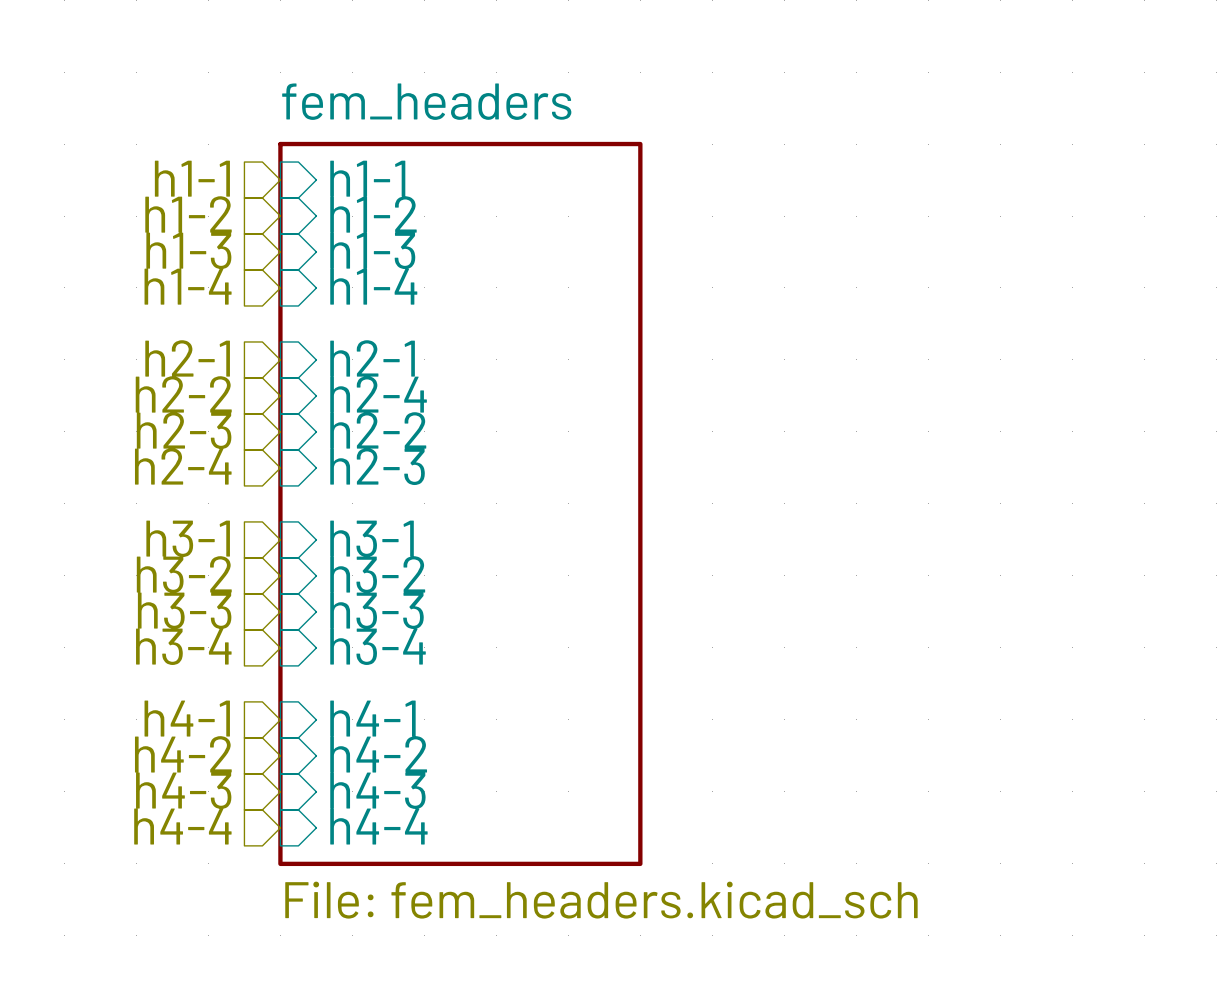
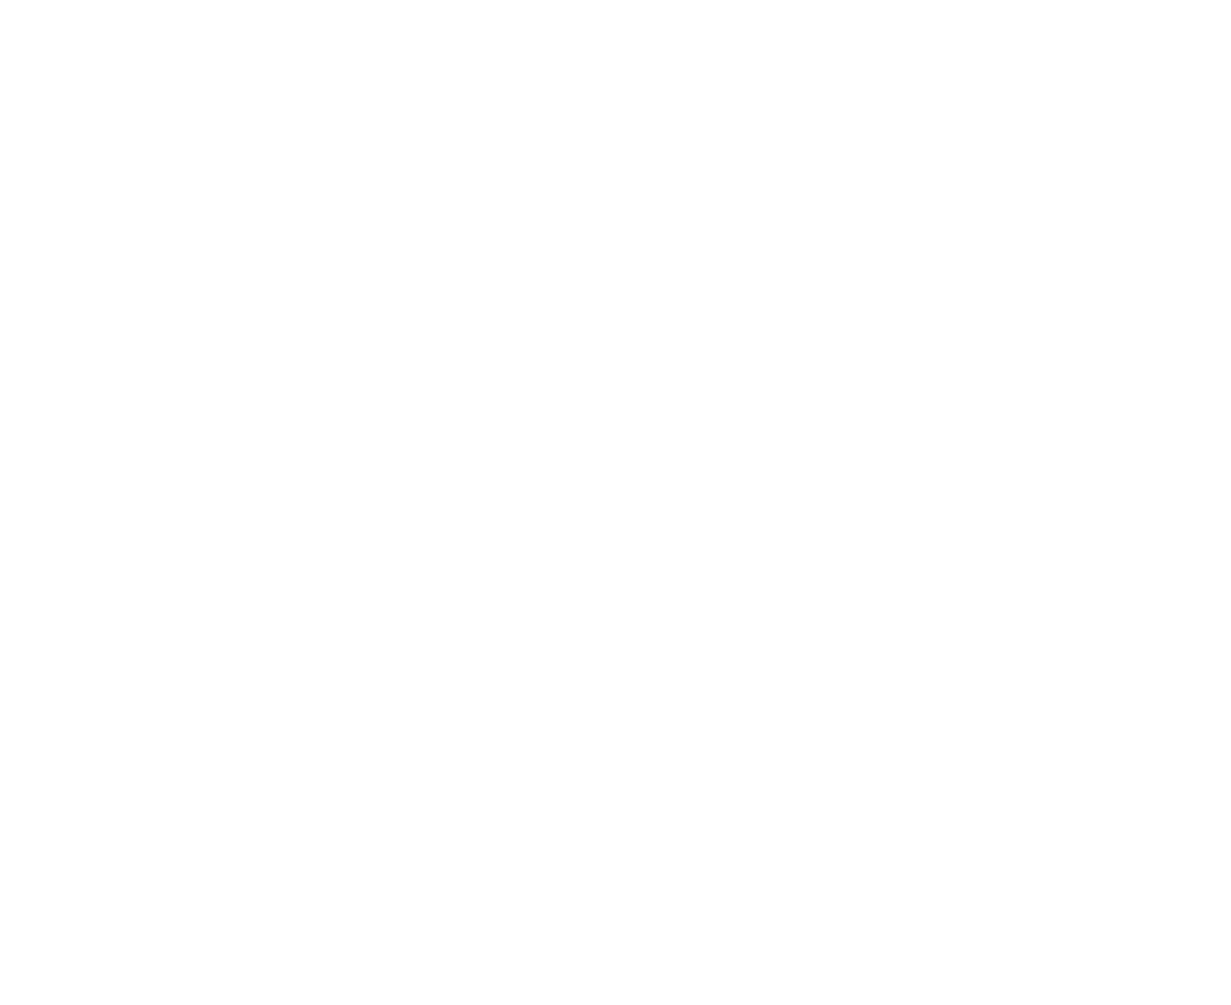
hierarchical label: h1-1 (192, 178) -> none
sheet pin: h1-1 (367, 178) -> none
hierarchical label: h1-2 (188, 214) -> none
sheet pin: h1-2 (373, 214) -> none
hierarchical label: h1-3 (188, 250) -> none
sheet pin: h1-3 (372, 250) -> none
hierarchical label: h1-4 (188, 286) -> none
sheet pin: h1-4 (373, 286) -> none
hierarchical label: h2-1 (187, 358) -> none
sheet pin: h2-1 (372, 358) -> none
hierarchical label: h2-2 (183, 394) -> none
sheet pin: h2-4 (378, 394) -> none
hierarchical label: h2-3 (184, 430) -> none
sheet pin: h2-2 (378, 430) -> none
hierarchical label: h2-4 (183, 466) -> none
sheet pin: h2-3 (377, 466) -> none
sheet fem_headers: File: fem_headers.kicad_sch (460, 503) -> none
hierarchical label: h3-1 (188, 538) -> none
sheet pin: h3-1 (372, 538) -> none
hierarchical label: h3-2 (184, 574) -> none
sheet pin: h3-2 (377, 574) -> none
hierarchical label: h3-3 (184, 610) -> none
sheet pin: h3-3 (376, 610) -> none
hierarchical label: h3-4 (183, 646) -> none
sheet pin: h3-4 (378, 646) -> none
hierarchical label: h4-1 (187, 718) -> none
sheet pin: h4-1 (372, 718) -> none
hierarchical label: h4-2 (183, 754) -> none
sheet pin: h4-2 (378, 754) -> none
hierarchical label: h4-3 (183, 790) -> none
sheet pin: h4-3 (377, 790) -> none
hierarchical label: h4-4 (182, 826) -> none
sheet pin: h4-4 (378, 826) -> none

